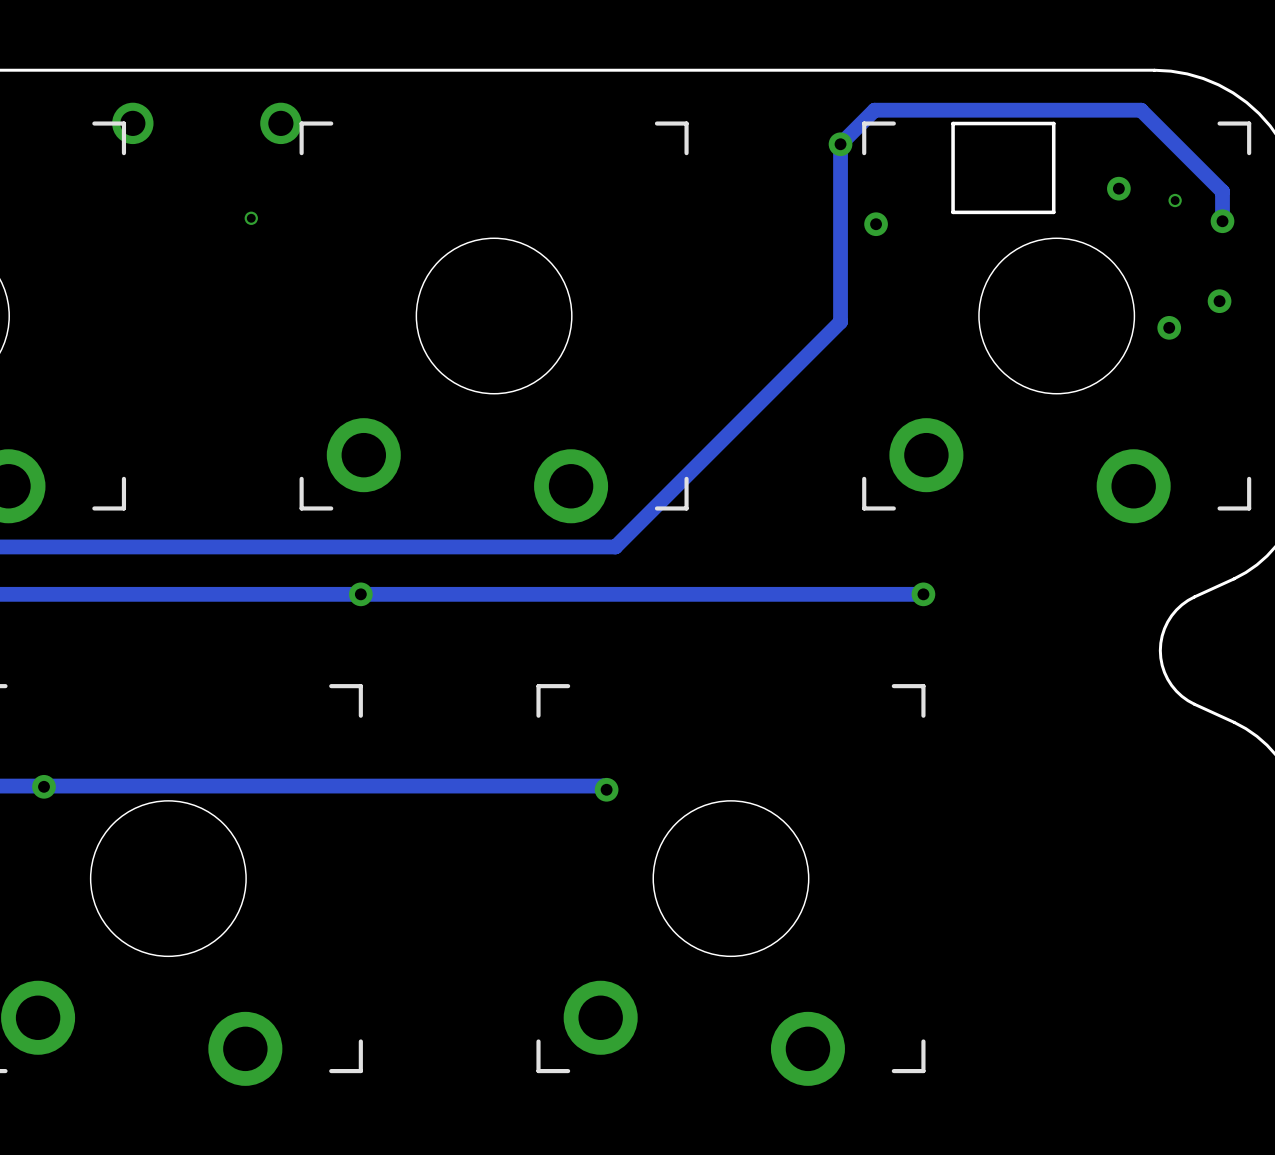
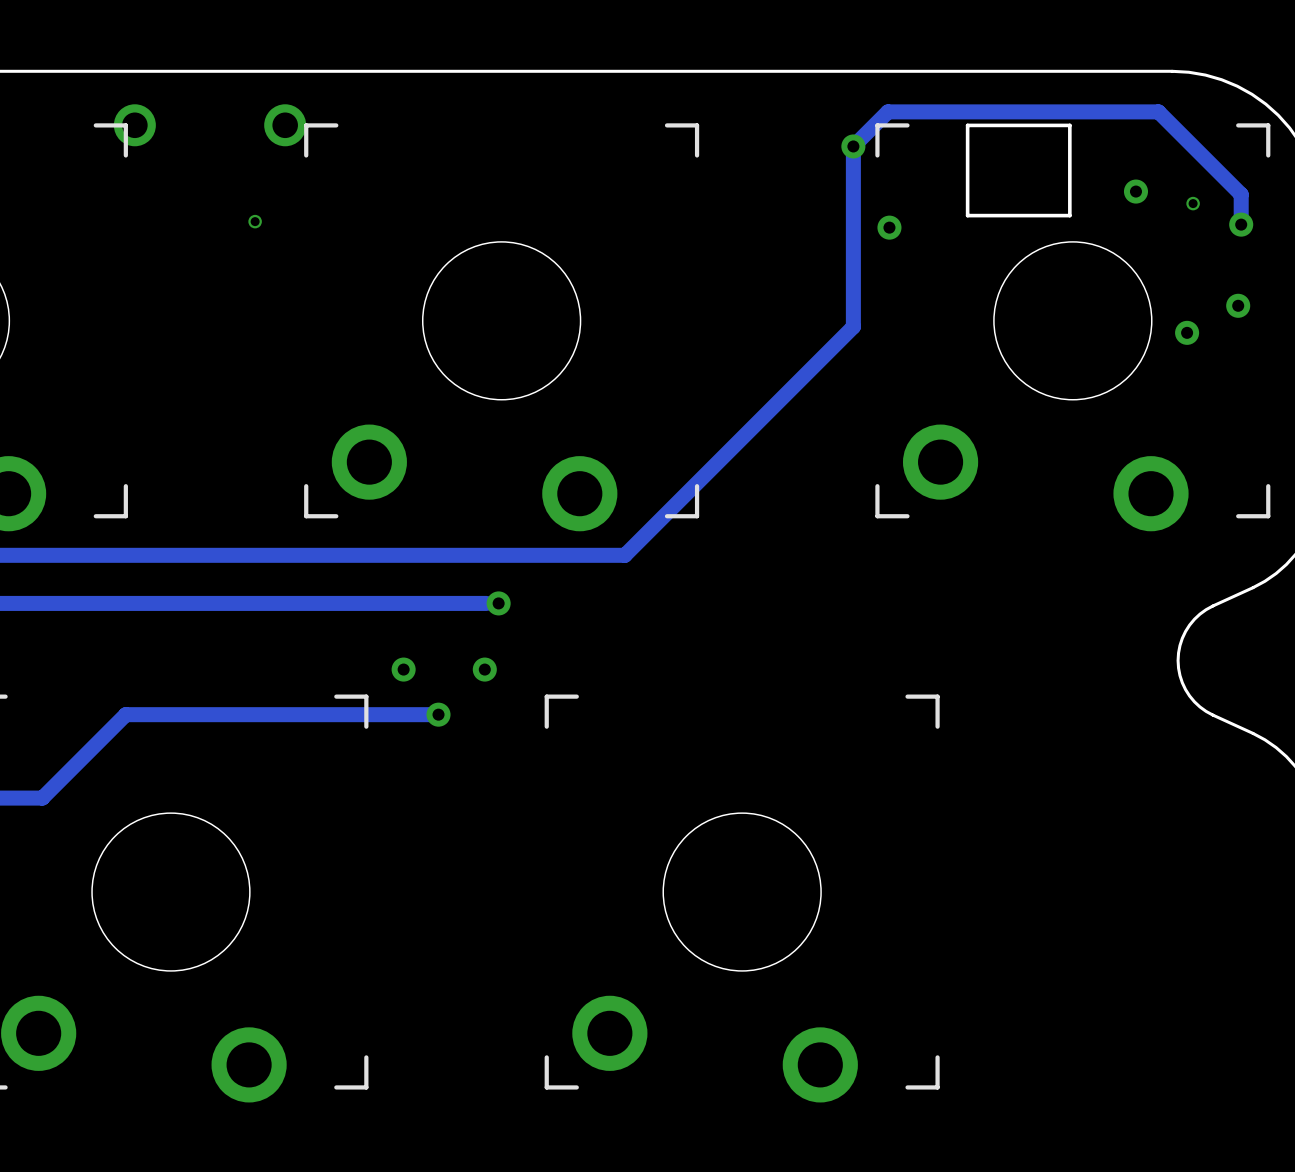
via: (360, 594) -> none
via: none -> (498, 603)
track: (923, 594) (479, 594) -> none
via: (923, 594) -> none
via: none -> (403, 669)
via: none -> (484, 669)
via: none -> (438, 714)
track: (41, 786) (602, 786) (606, 789) -> (42, 798) (125, 714) (438, 714)
via: (44, 786) -> none
via: (606, 789) -> none

